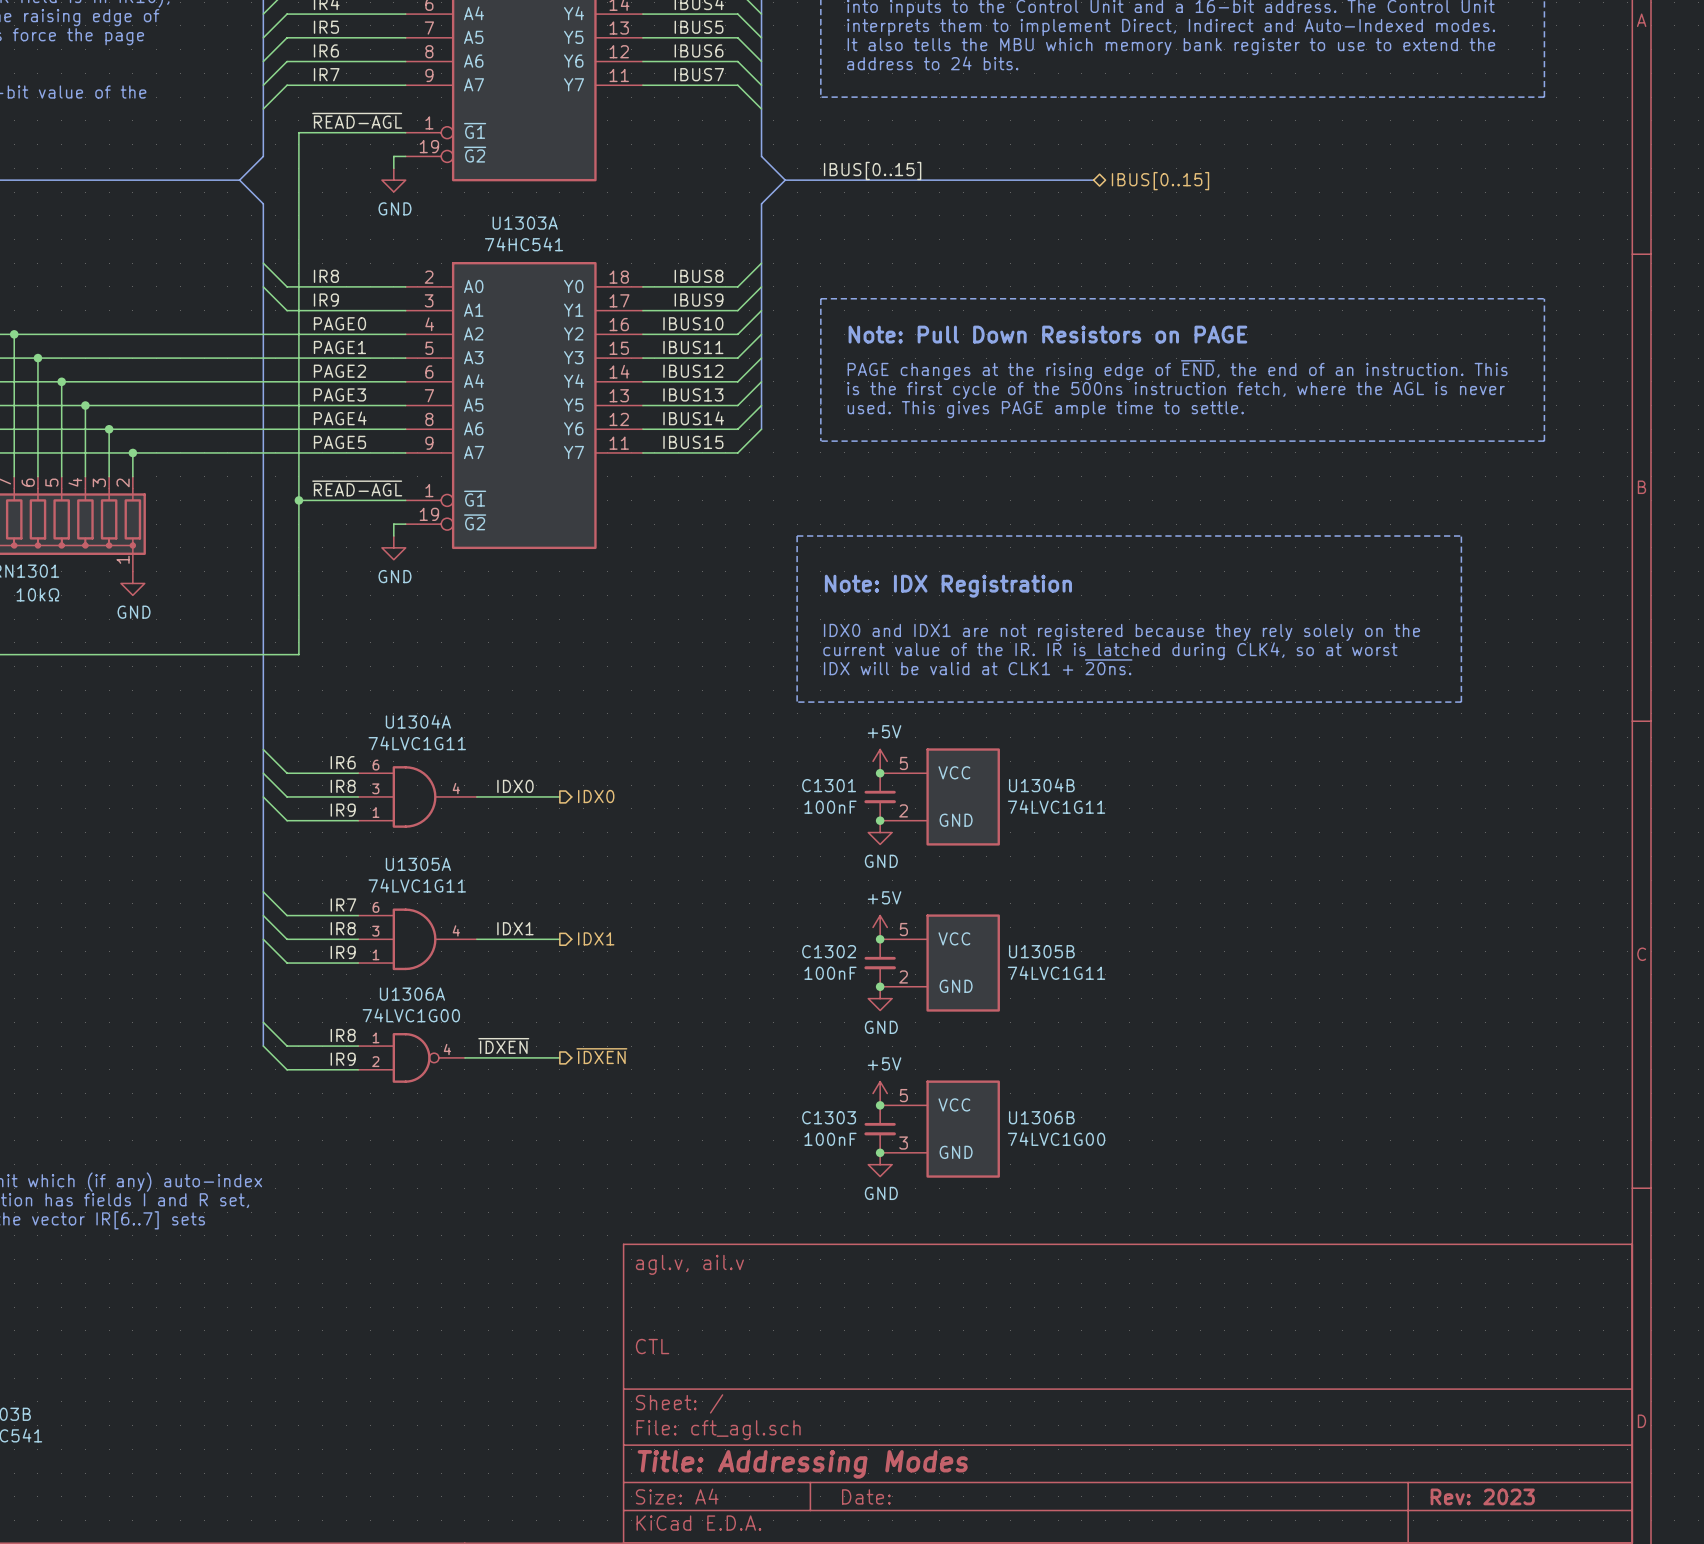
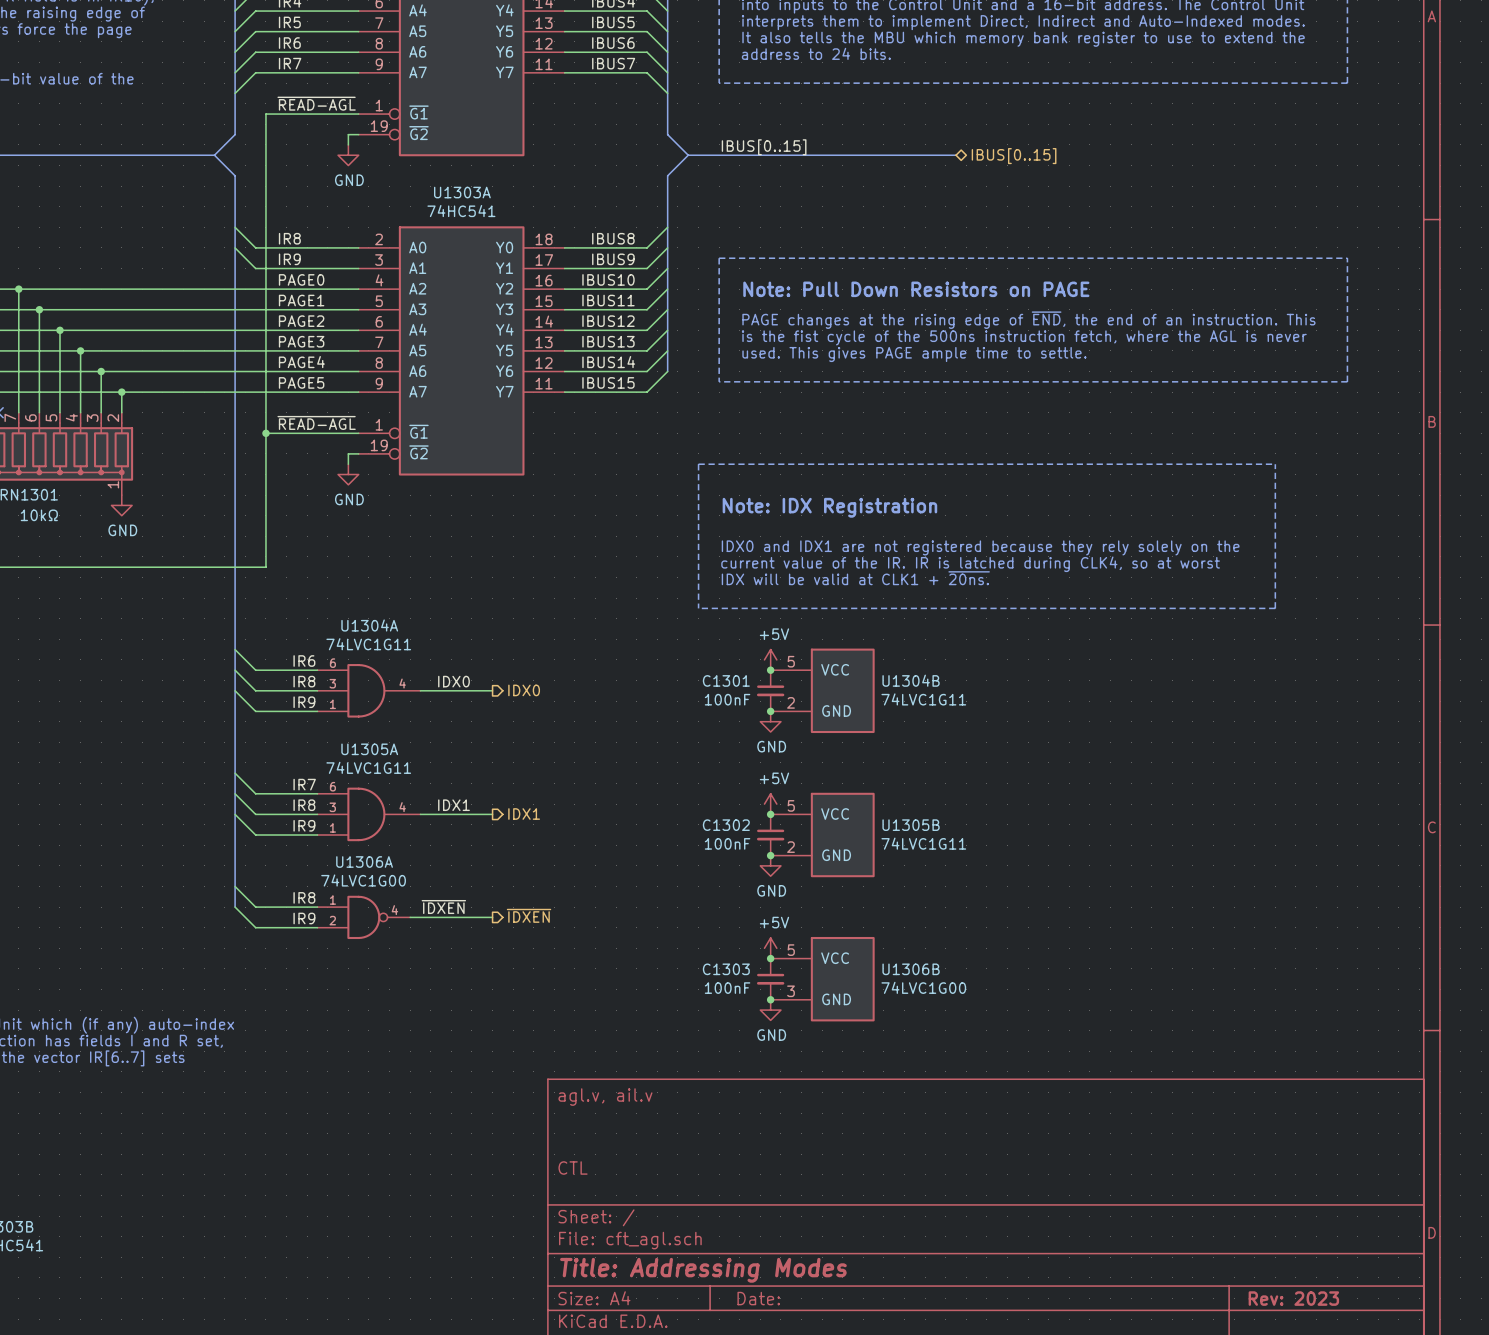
text: is the first cycle of the 500ns instruction fetch, where the AGL is never (1175, 390) -> is the fist cycle of the 500ns instruction fetch, where the AGL is never (1024, 337)

